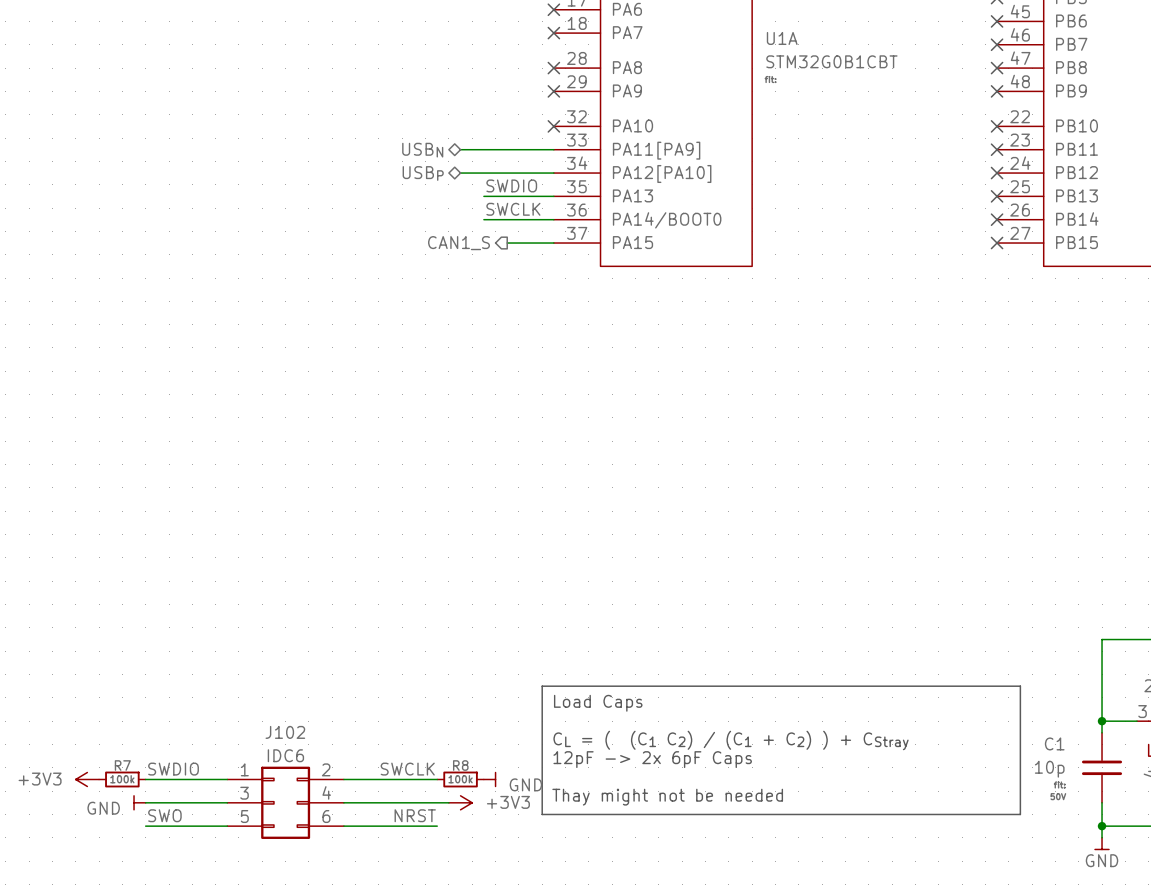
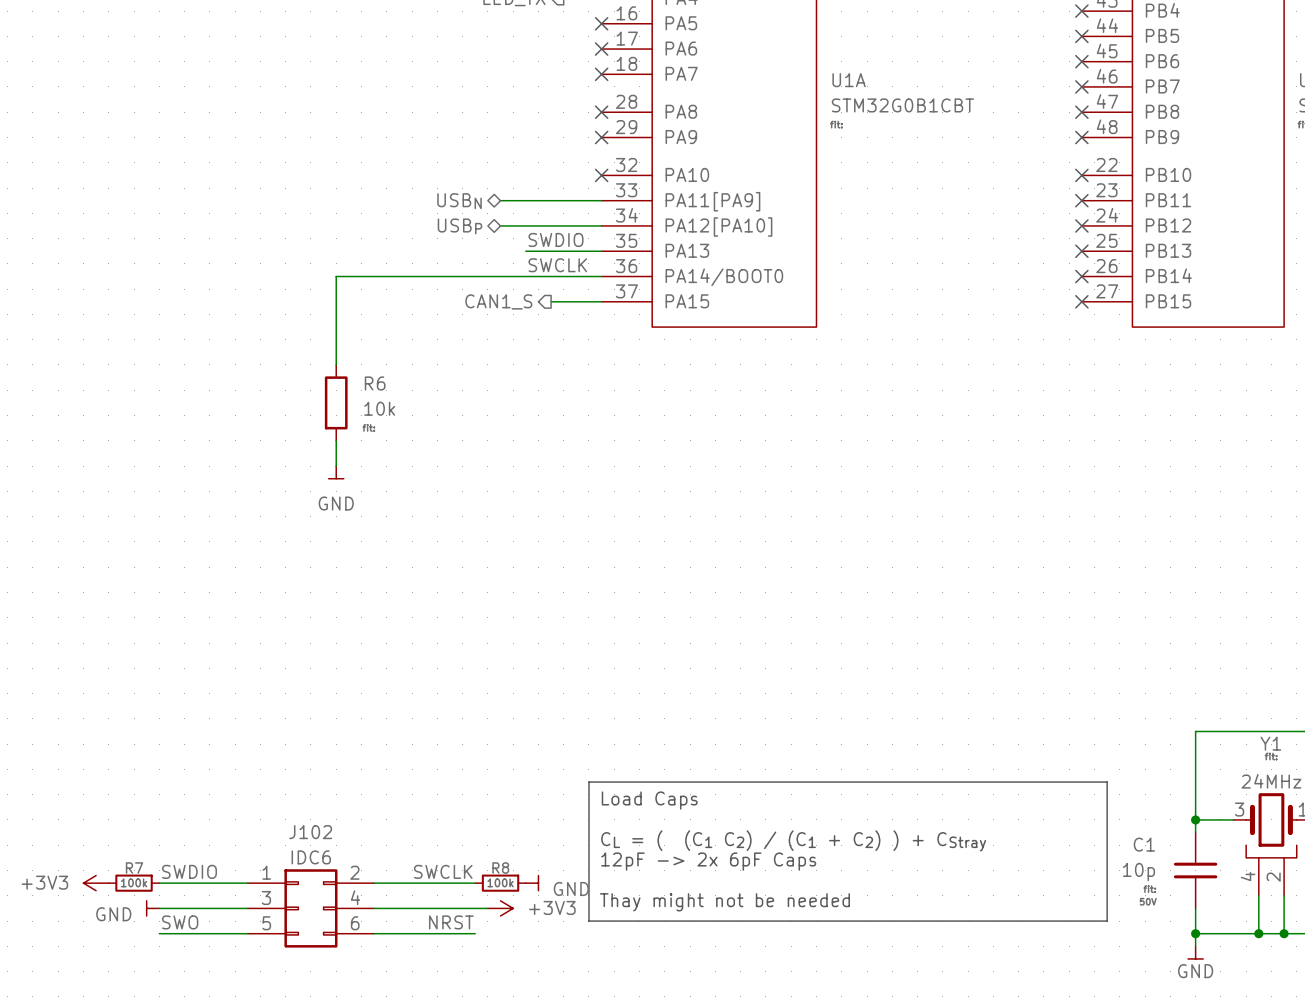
wire: none -> (525, 276) (336, 276) (336, 364)
R6: none -> (336, 402)
wire: none -> (336, 440) (336, 466)
power symbol: none -> GND (336, 472)

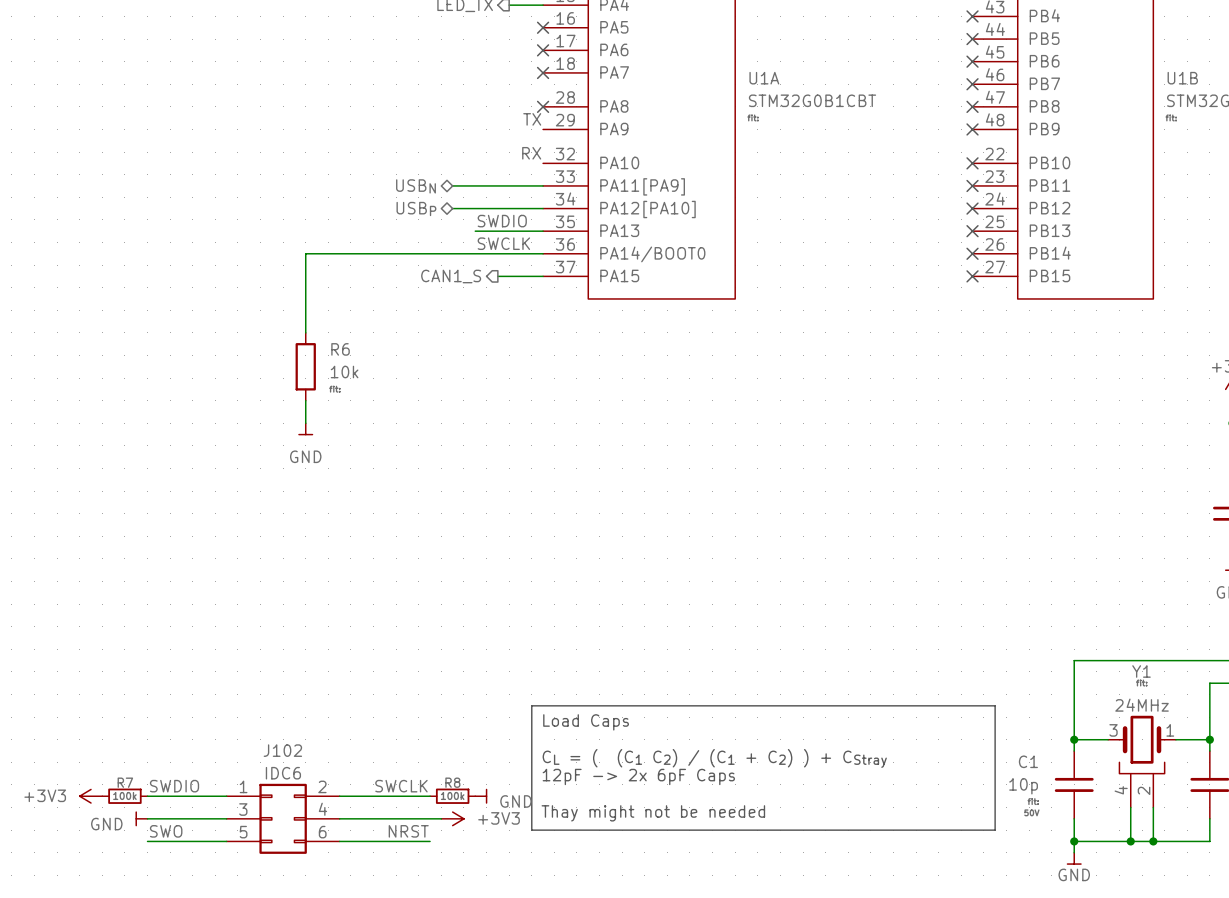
label: none -> TX (532, 119)
no-connect mark: (601, 137) -> none
label: none -> RX (531, 153)
no-connect mark: (601, 175) -> none

